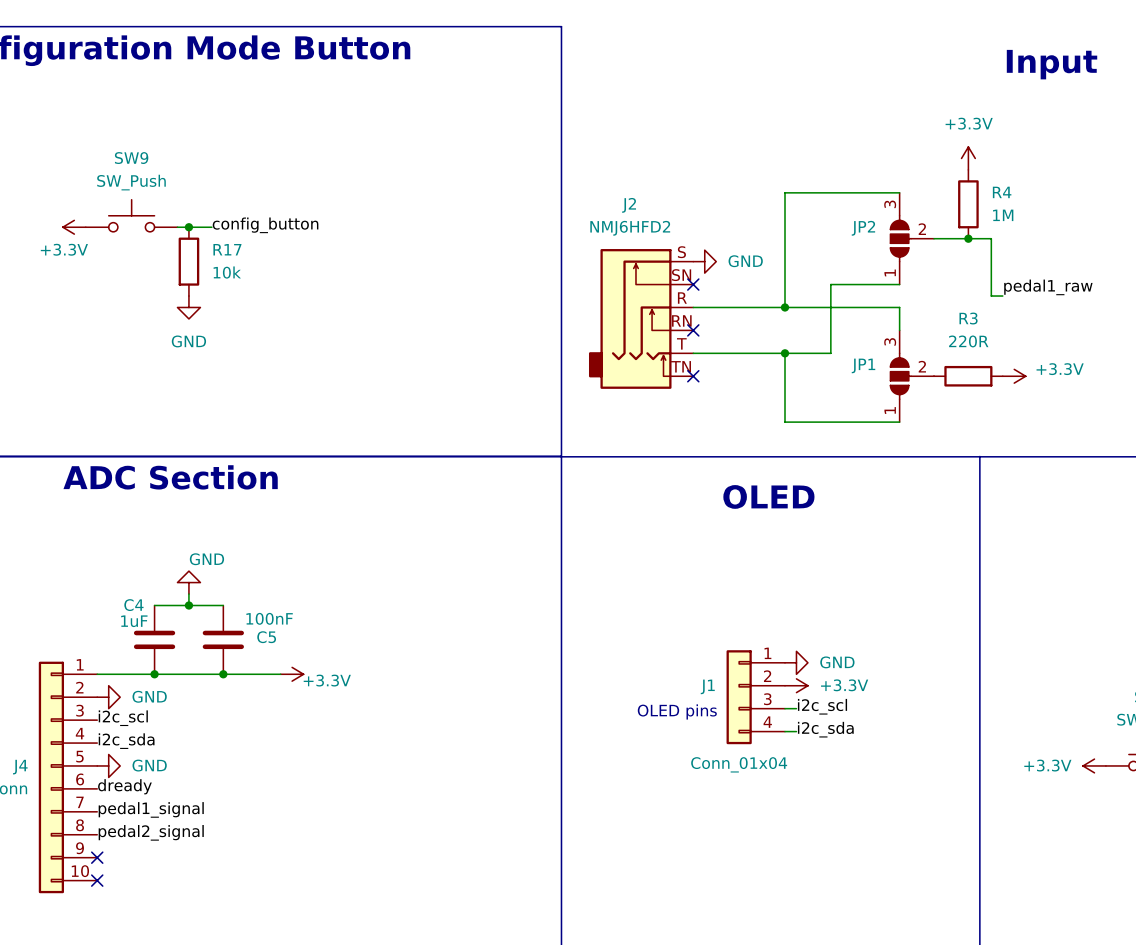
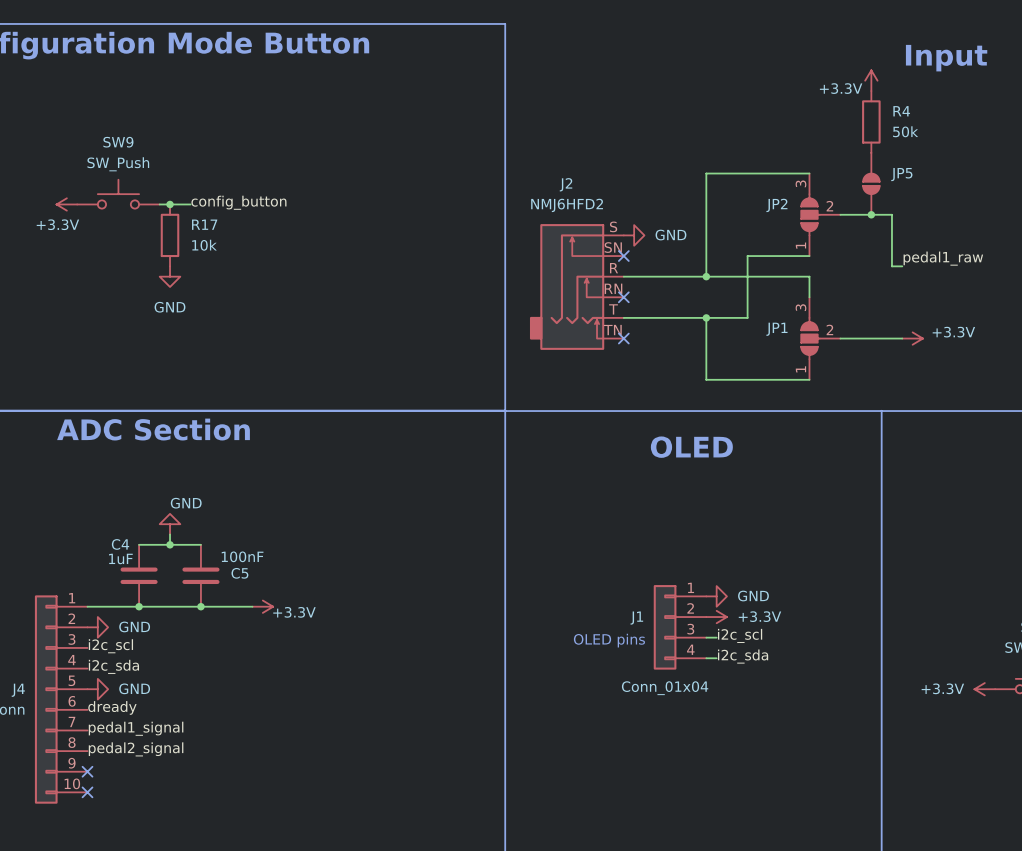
power symbol text position: +3.3V (969, 123) -> +3.3V (841, 88)
power symbol position: +3.3V (968, 158) -> +3.3V (871, 80)
R4 position: (968, 204) -> (871, 121)
JP5: none -> (871, 183)
R4 value: 1M (1003, 215) -> 50k (905, 131)
wire: none -> (840, 338) (902, 338)
R3: 220R (968, 376) -> none

